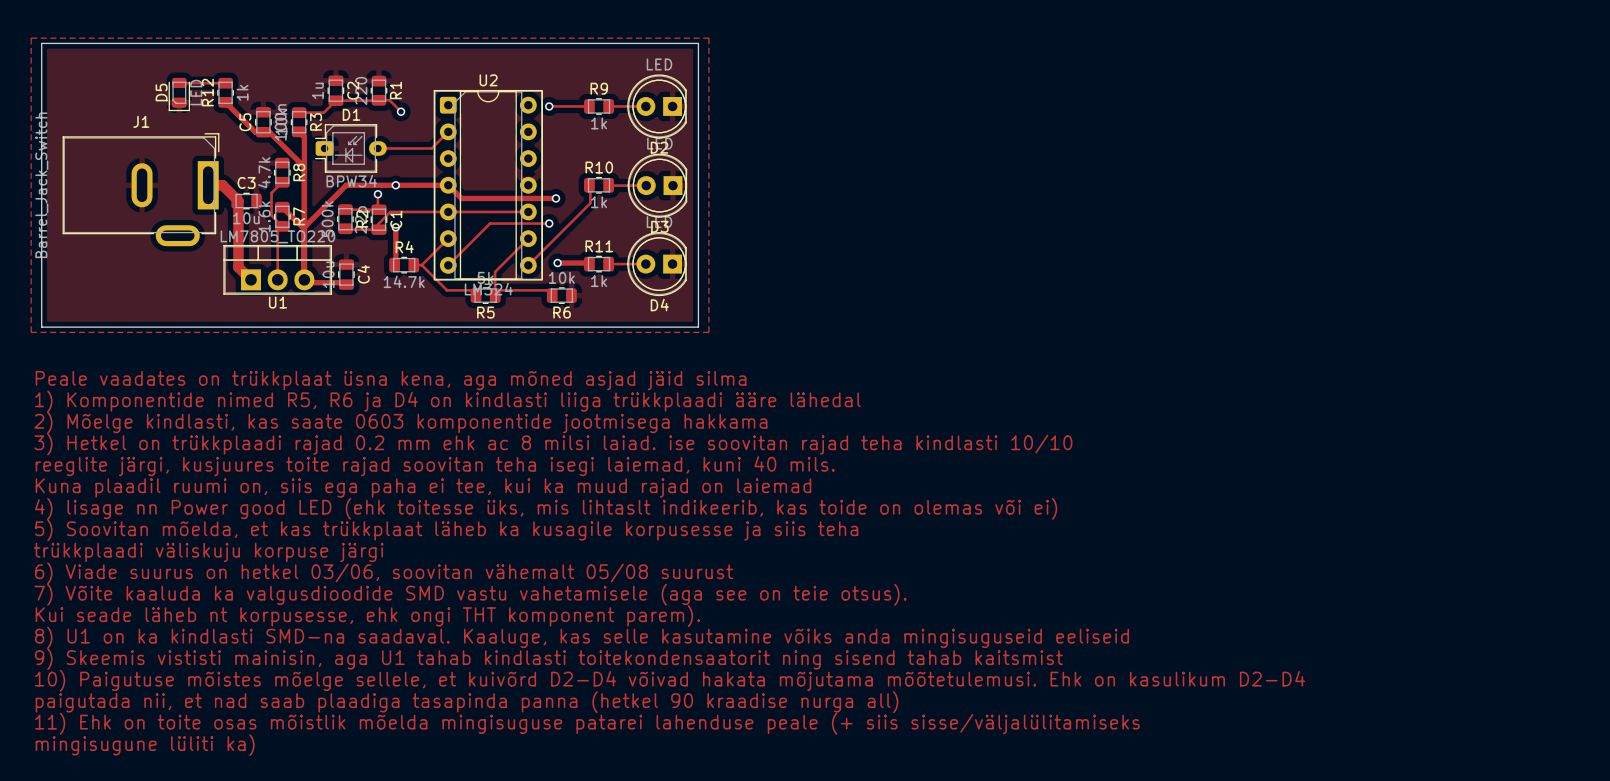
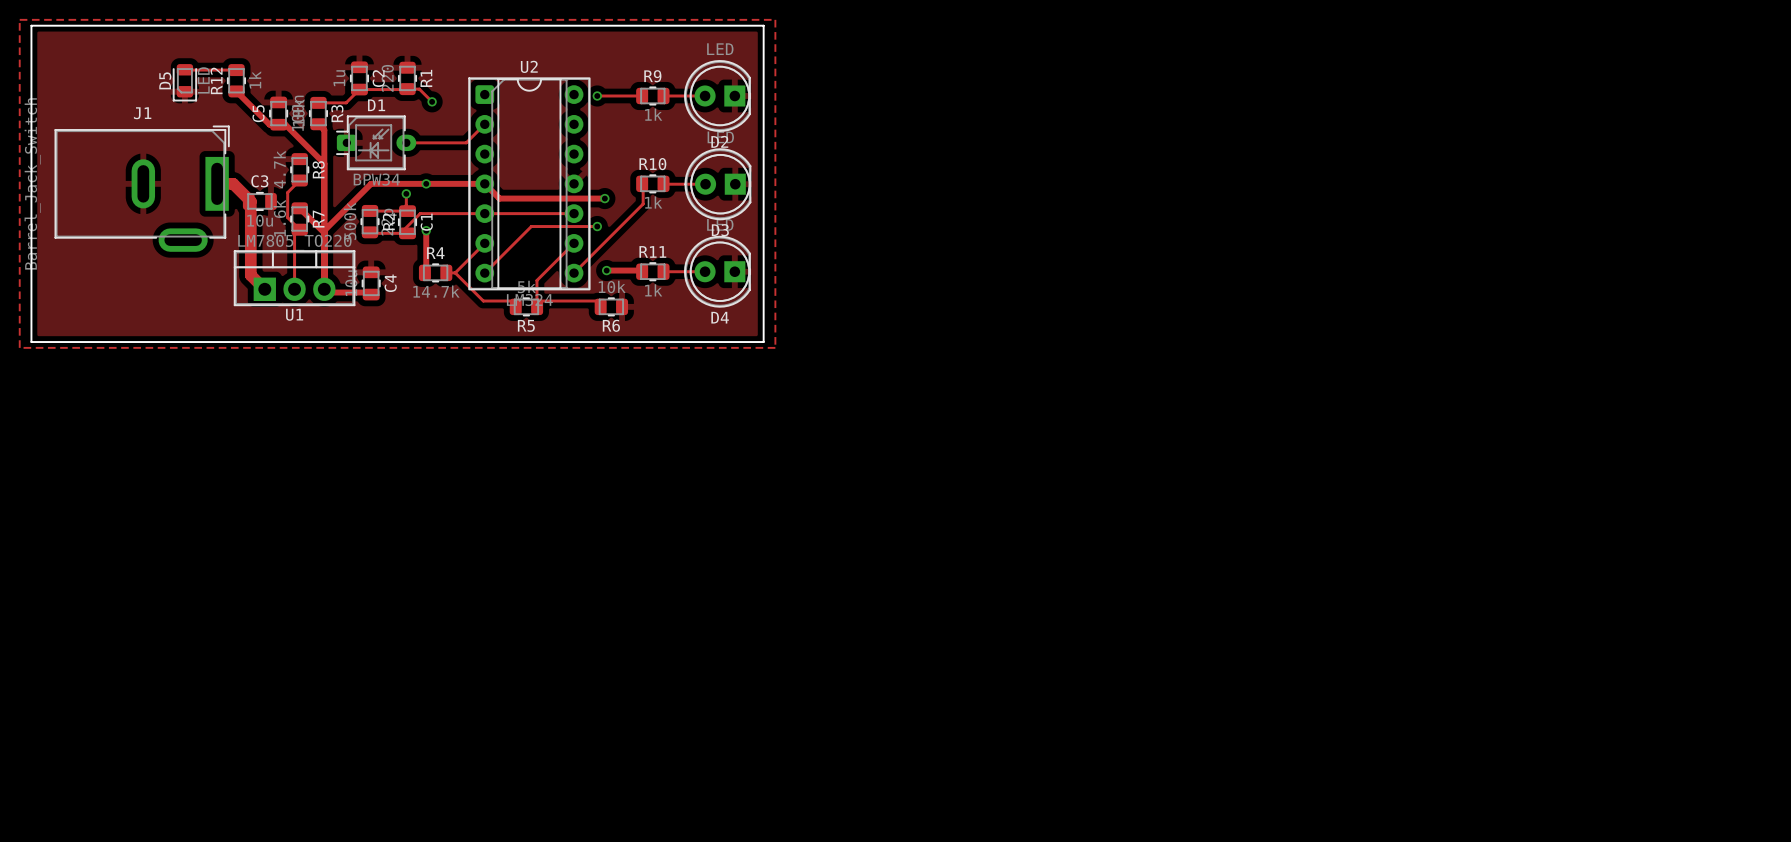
text: Peale vaadates on trükkplaat üsna kena, aga mõned asjad jäid silma (391, 380) -> none
text: 1) Komponentide nimed R5, R6 ja D4 on kindlasti liiga trükkplaadi ääre lähedal (447, 401) -> none
text: 2) Mõelge kindlasti, kas saate 0603 komponentide jootmisega hakkama (400, 422) -> none
text: 3) Hetkel on trükkplaadi rajad 0.2 mm ehk ac 8 milsi laiad. ise soovitan rajad teha kindlasti 10/10 (553, 444) -> none
text: reeglite järgi, kusjuures toite rajad soovitan teha isegi laiemad, kuni 40 mils. (435, 466) -> none
text: Kuna plaadil ruumi on, siis ega paha ei tee, kui ka muud rajad on laiemad (423, 487) -> none
text: 4) lisage nn Power good LED (ehk toitesse üks, mis lihtaslt indikeerib, kas toide on olemas või ei) (546, 508) -> none
text: 5) Soovitan mõelda, et kas trükkplaat läheb ka kusagile korpusesse ja siis teha (446, 530) -> none
text: trükkplaadi väliskuju korpuse järgi (208, 552) -> none
text: 6) Viade suurus on hetkel 03/06, soovitan vähemalt 05/08 suurust (384, 573) -> none
text: 7) Võite kaaluda ka valgusdioodide SMD vastu vahetamisele (aga see on teie otsus). (470, 594) -> none
text: Kui seade läheb nt korpusesse, ehk ongi THT komponent parem). (367, 616) -> none
text: 8) U1 on ka kindlasti SMD-na saadaval. Kaaluge, kas selle kasutamine võiks anda mingisuguseid eeliseid (582, 637) -> none
text: 9) Skeemis vististi mainisin, aga U1 tahab kindlasti toitekondensaatorit ning sisend tahab kaitsmist (548, 659) -> none
text: 10) Paigutuse mõistes mõelge sellele, et kuivõrd D2-D4 võivad hakata mõjutama mõõtetulemusi. Ehk on kasulikum D2-D4 (670, 680) -> none
text: paigutada nii, et nad saab plaadiga tasapinda panna (hetkel 90 kraadise nurga all) (467, 702) -> none
text: 11) Ehk on toite osas mõistlik mõelda mingisuguse patarei lahenduse peale (+ siis sisse/väljalülitamiseks (587, 723) -> none
text: mingisugune lüliti ka) (145, 745) -> none

